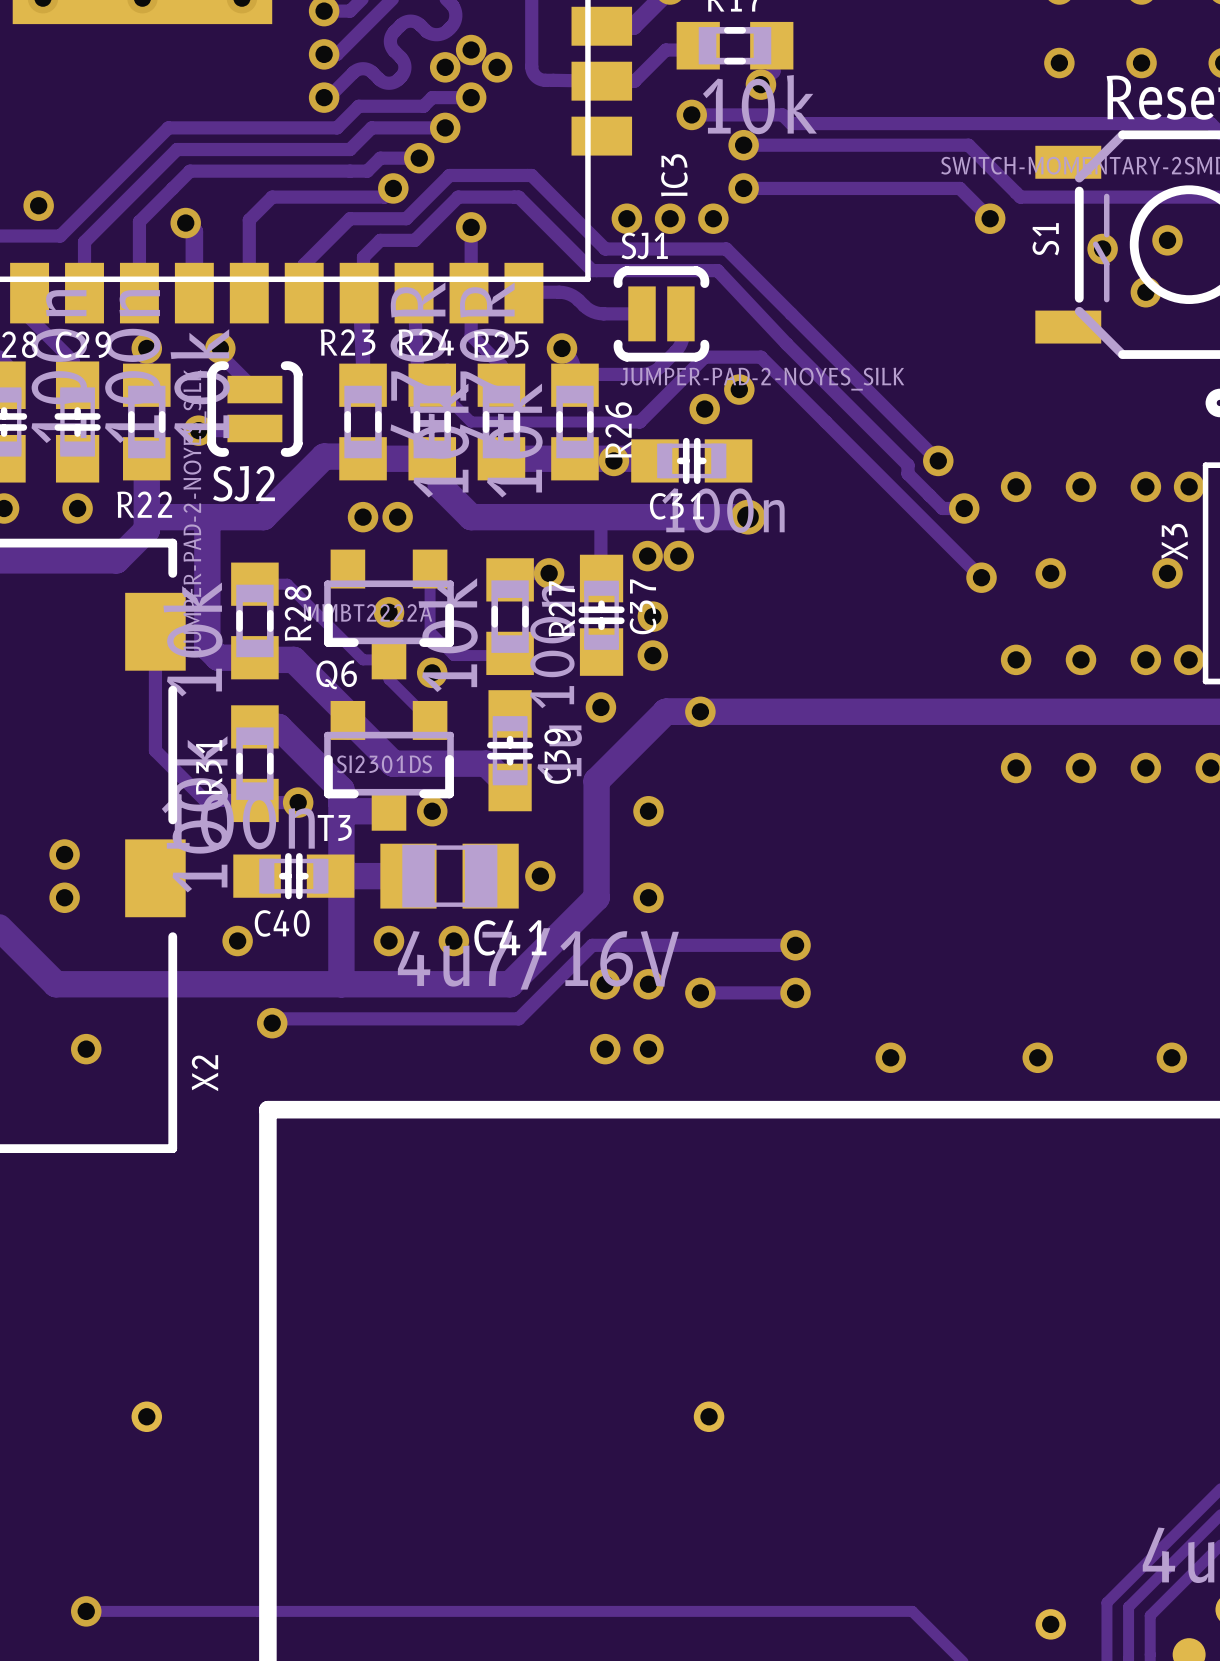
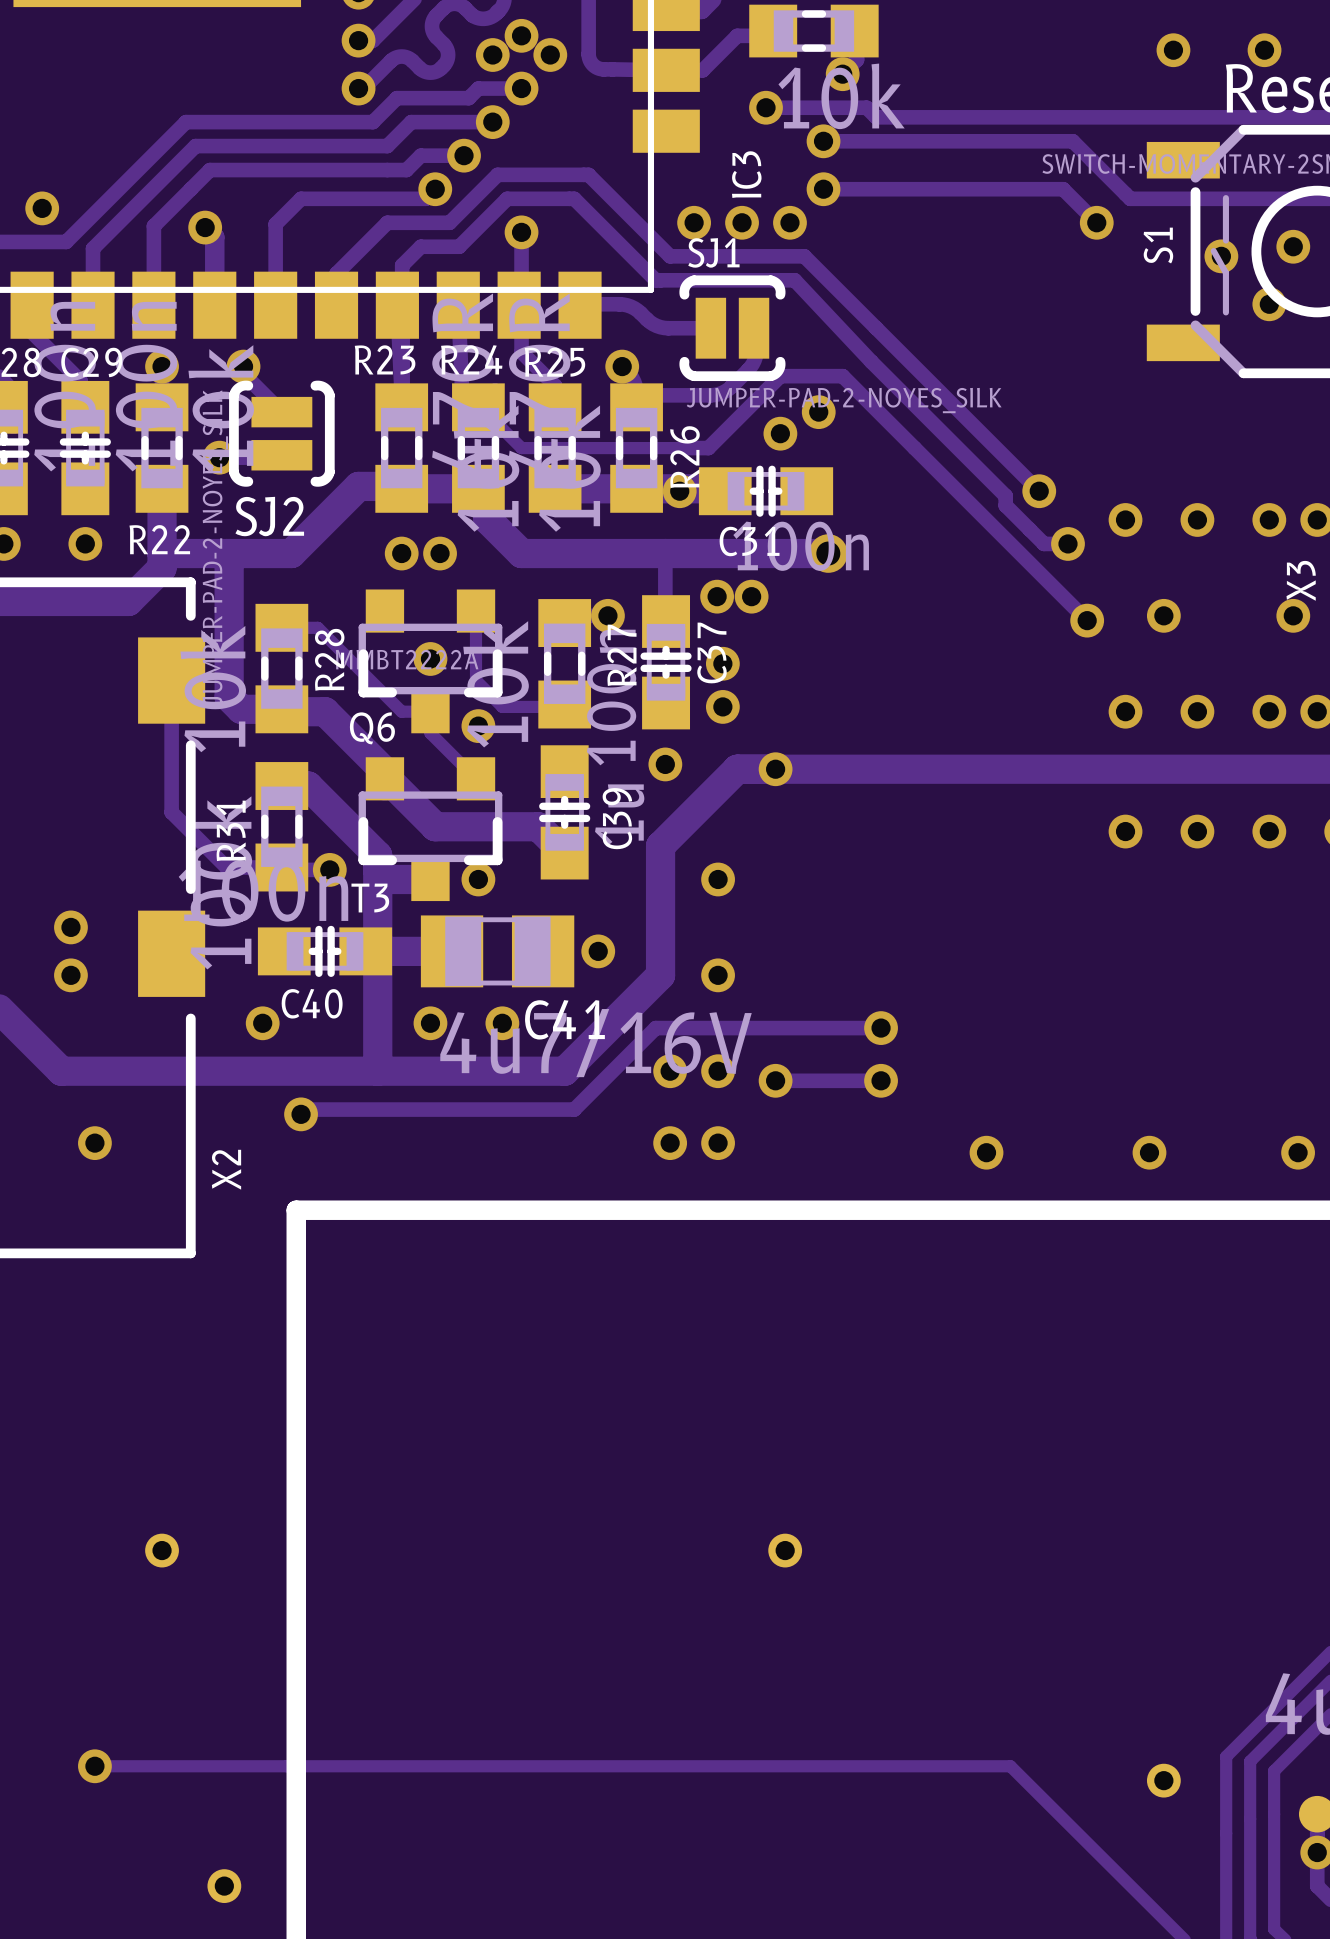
T3 value: SI2301DS (384, 764) -> none

